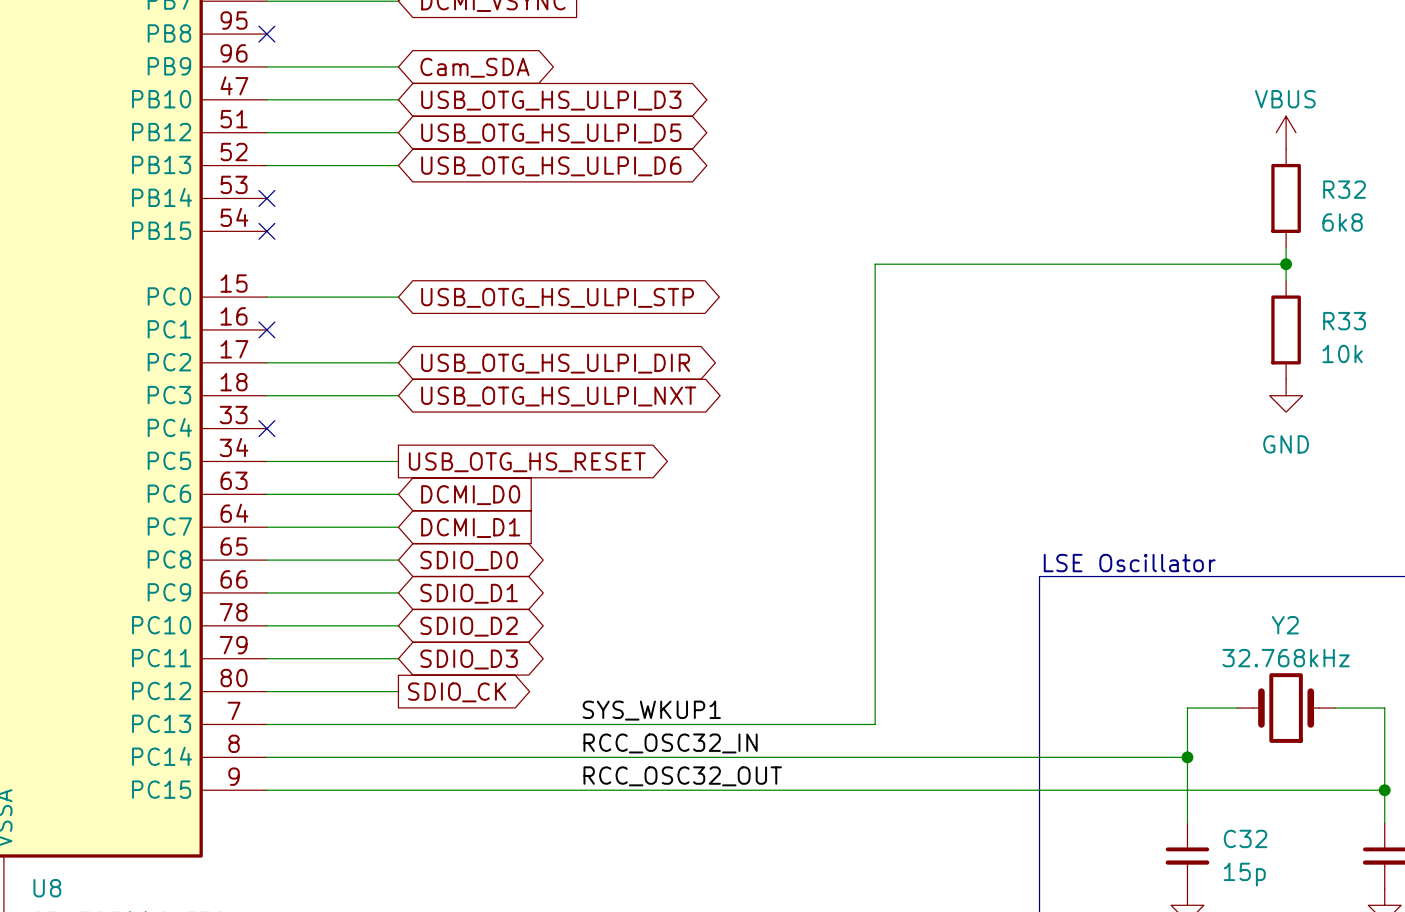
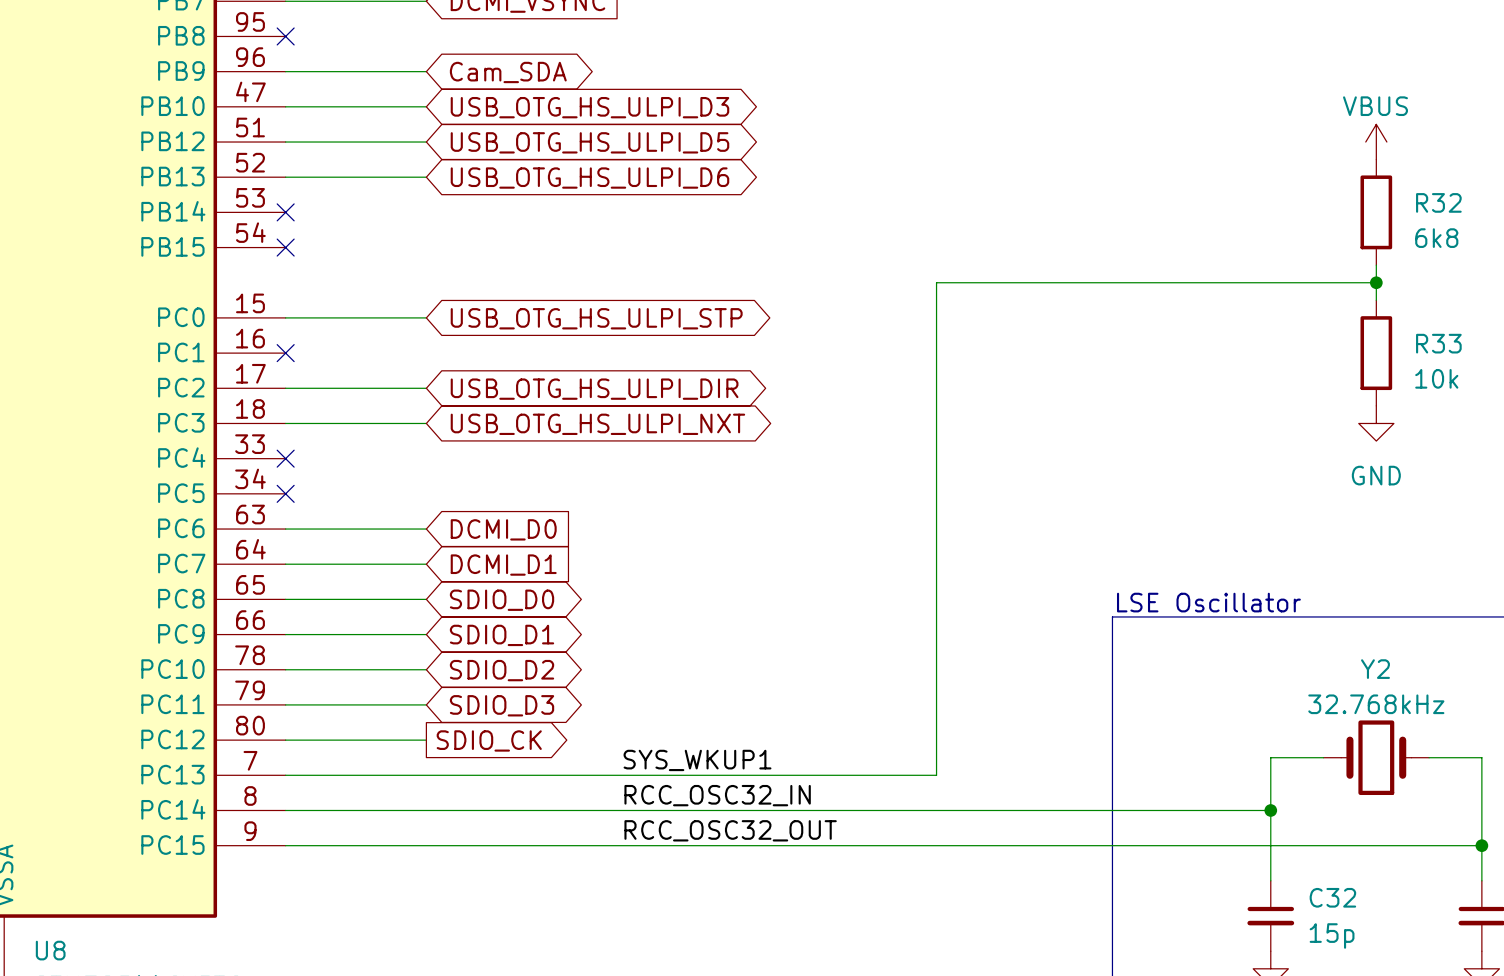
wire: (266, 461) (398, 461) -> none
no-connect mark: none -> (285, 493)
global label: USB_OTG_HS_RESET (527, 462) -> none

